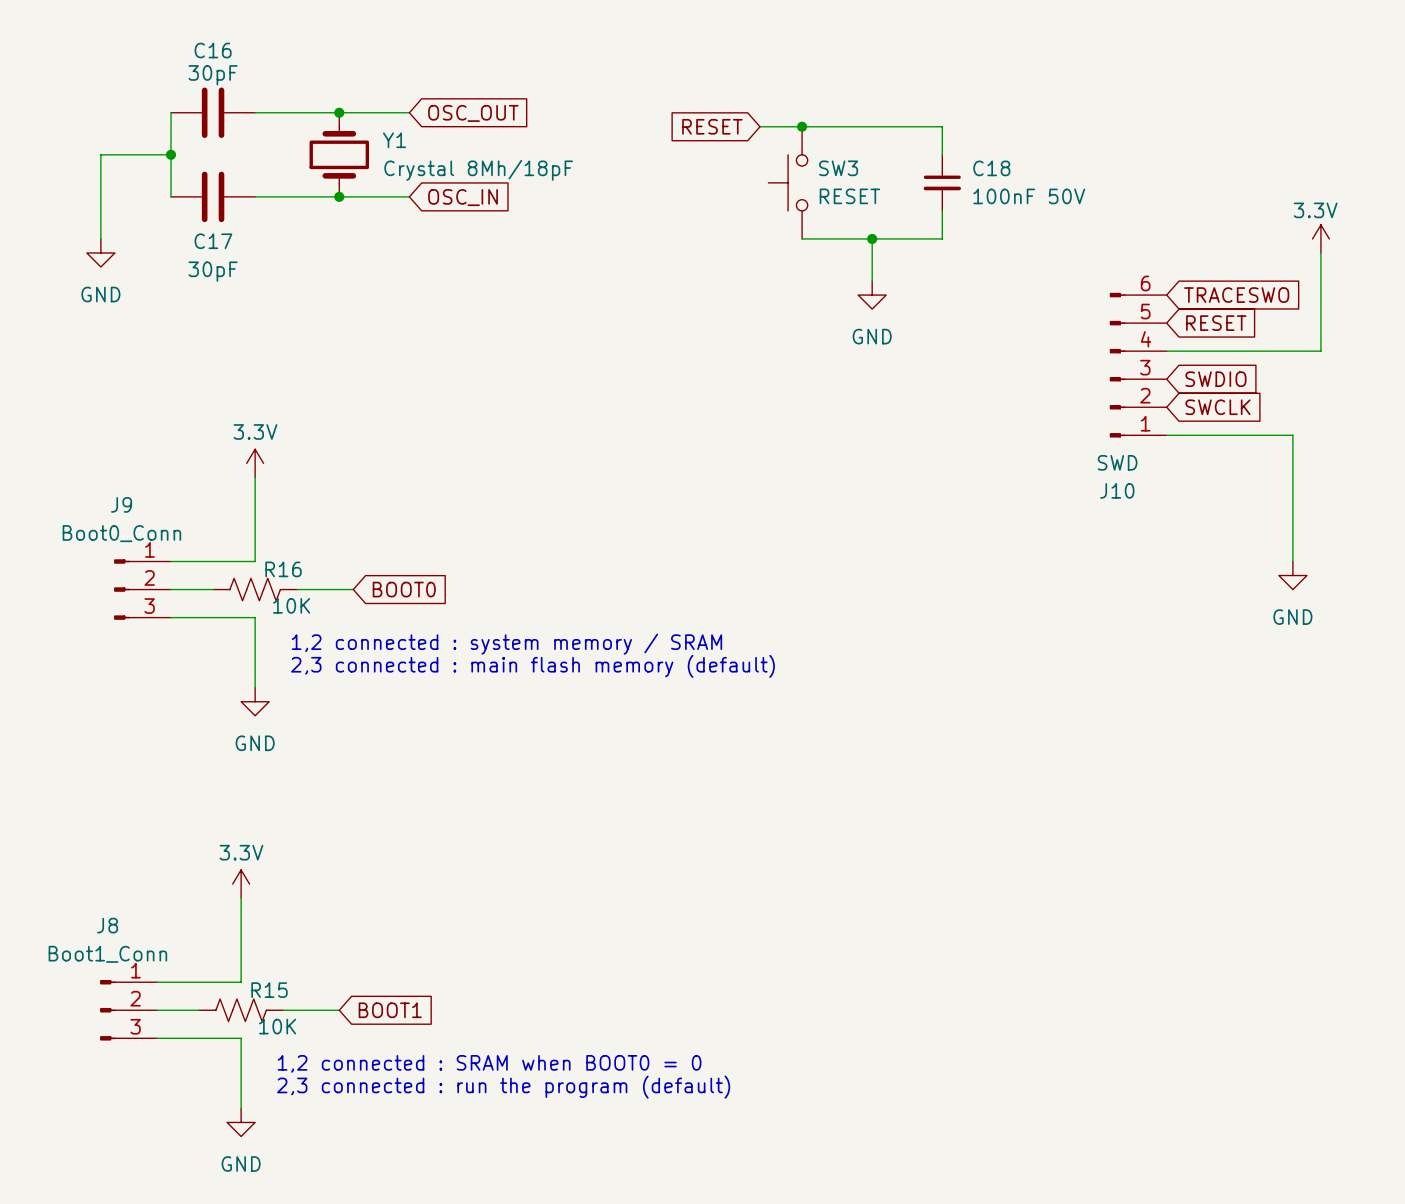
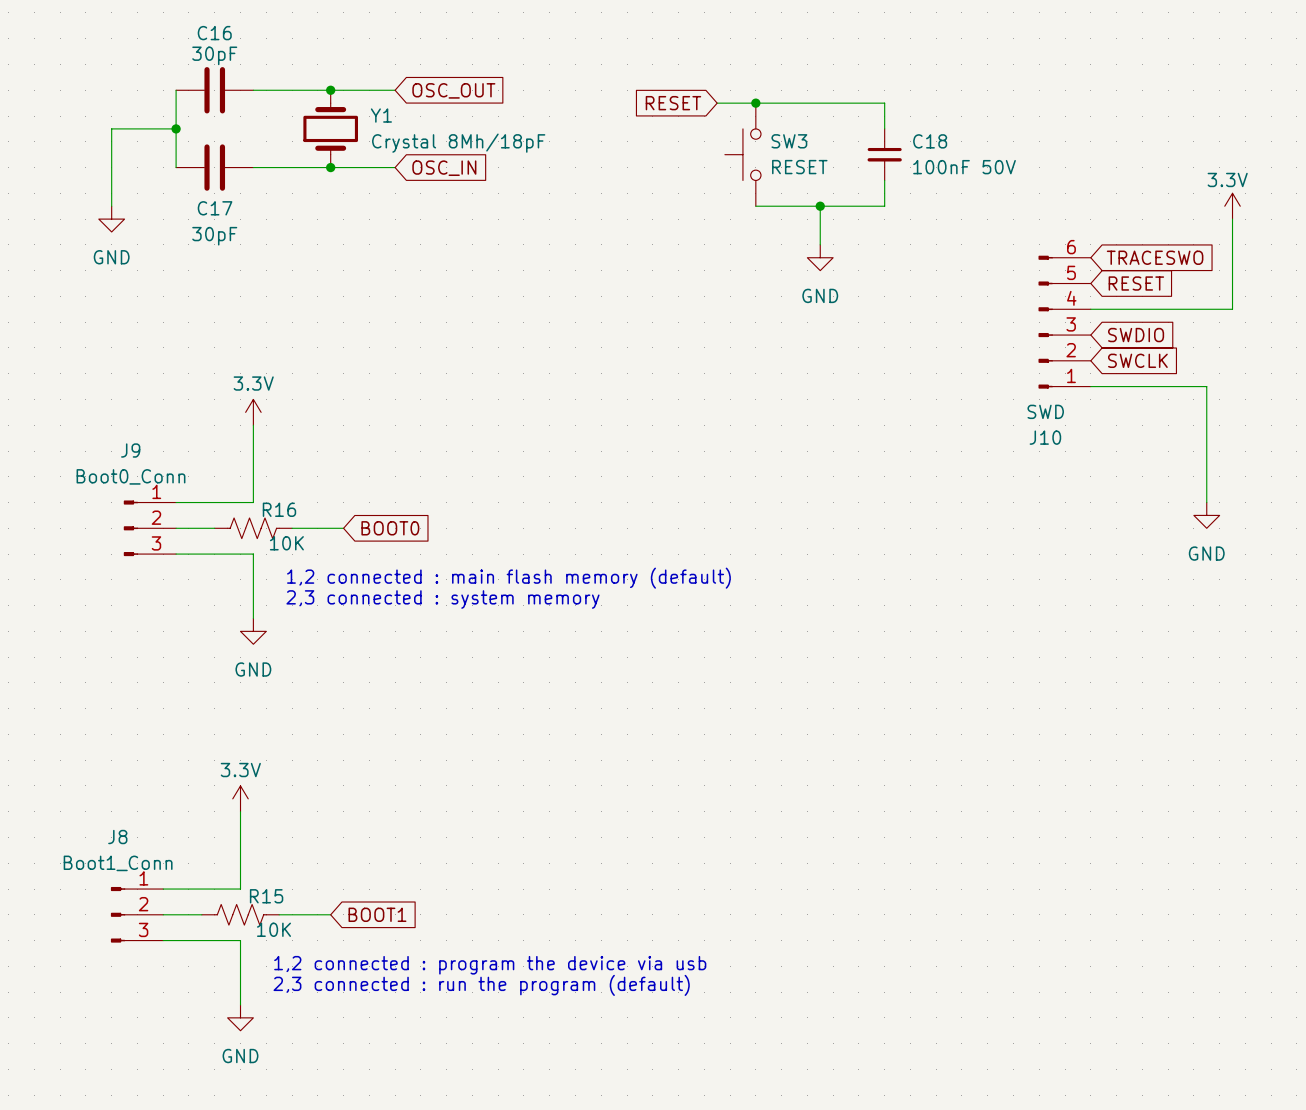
text: 1,2 connected : system memory / SRAM (506, 644) -> 1,2 connected : main flash memory (default) (508, 578)
text: 2,3 connected : main flash memory (default) (532, 666) -> 2,3 connected : system memory (442, 599)
text: 1,2 connected : SRAM when BOOT0 = 0 (489, 1063) -> 1,2 connected : program the device via usb (490, 965)

